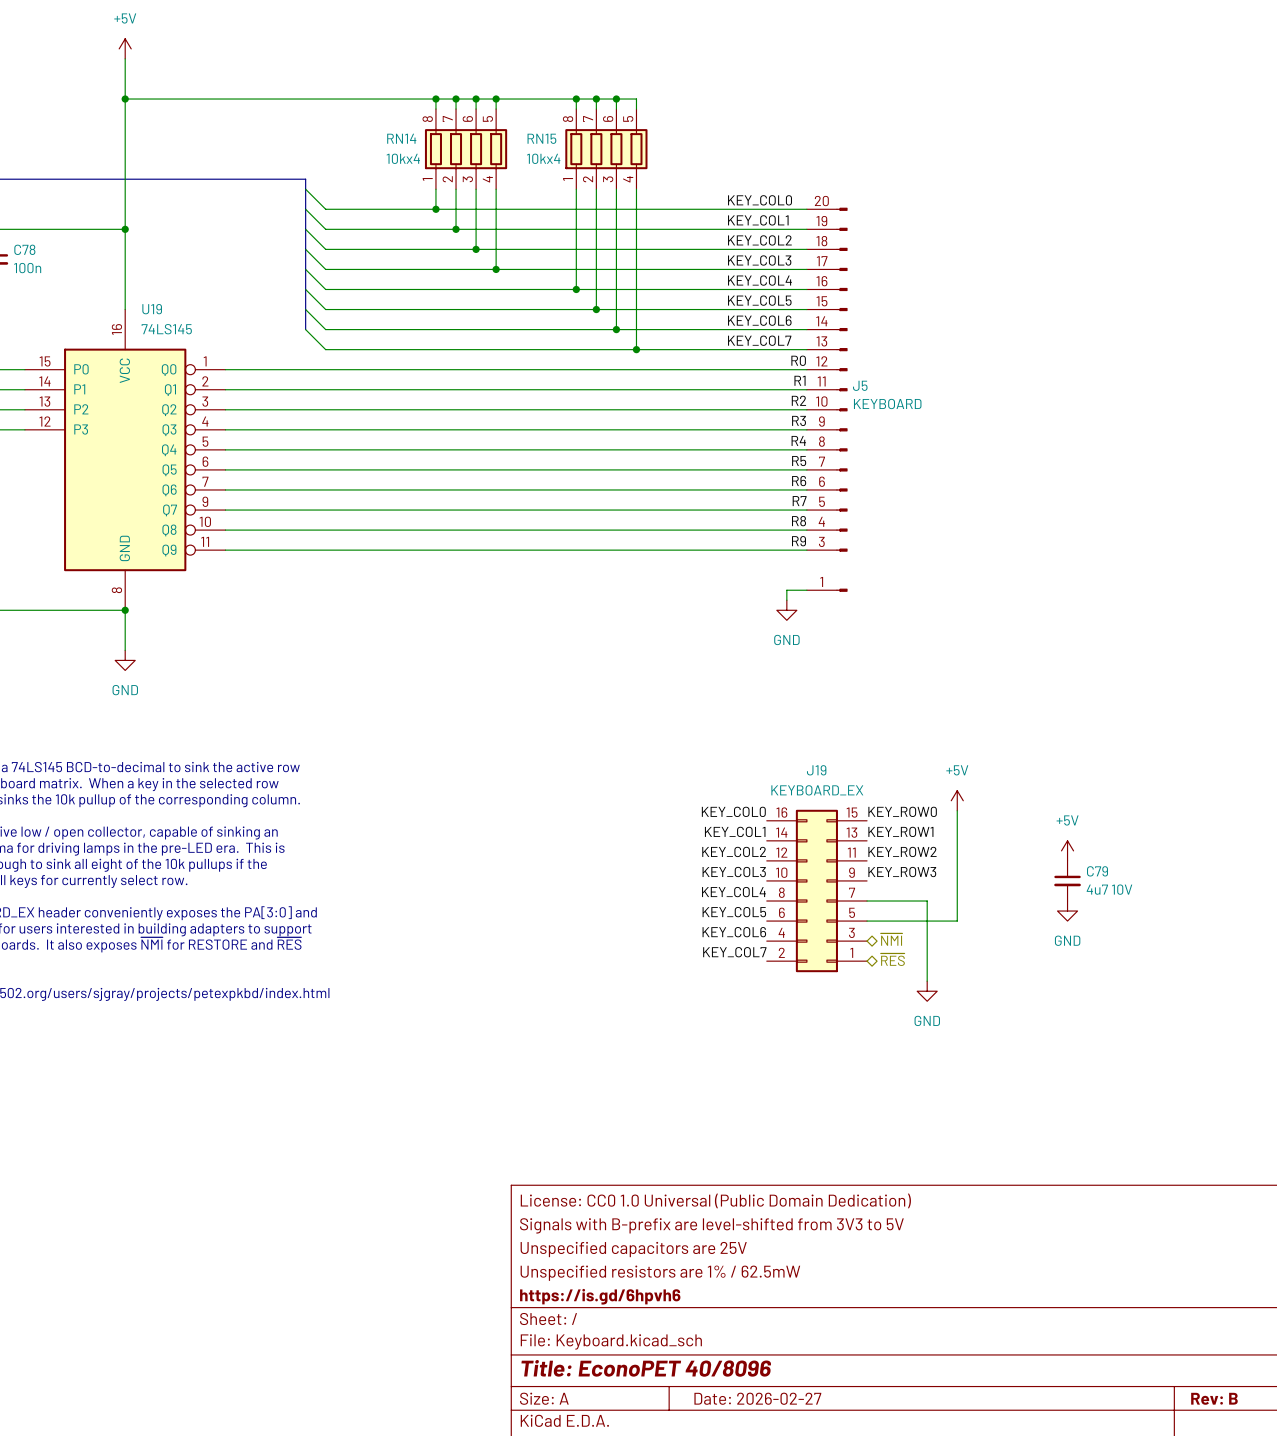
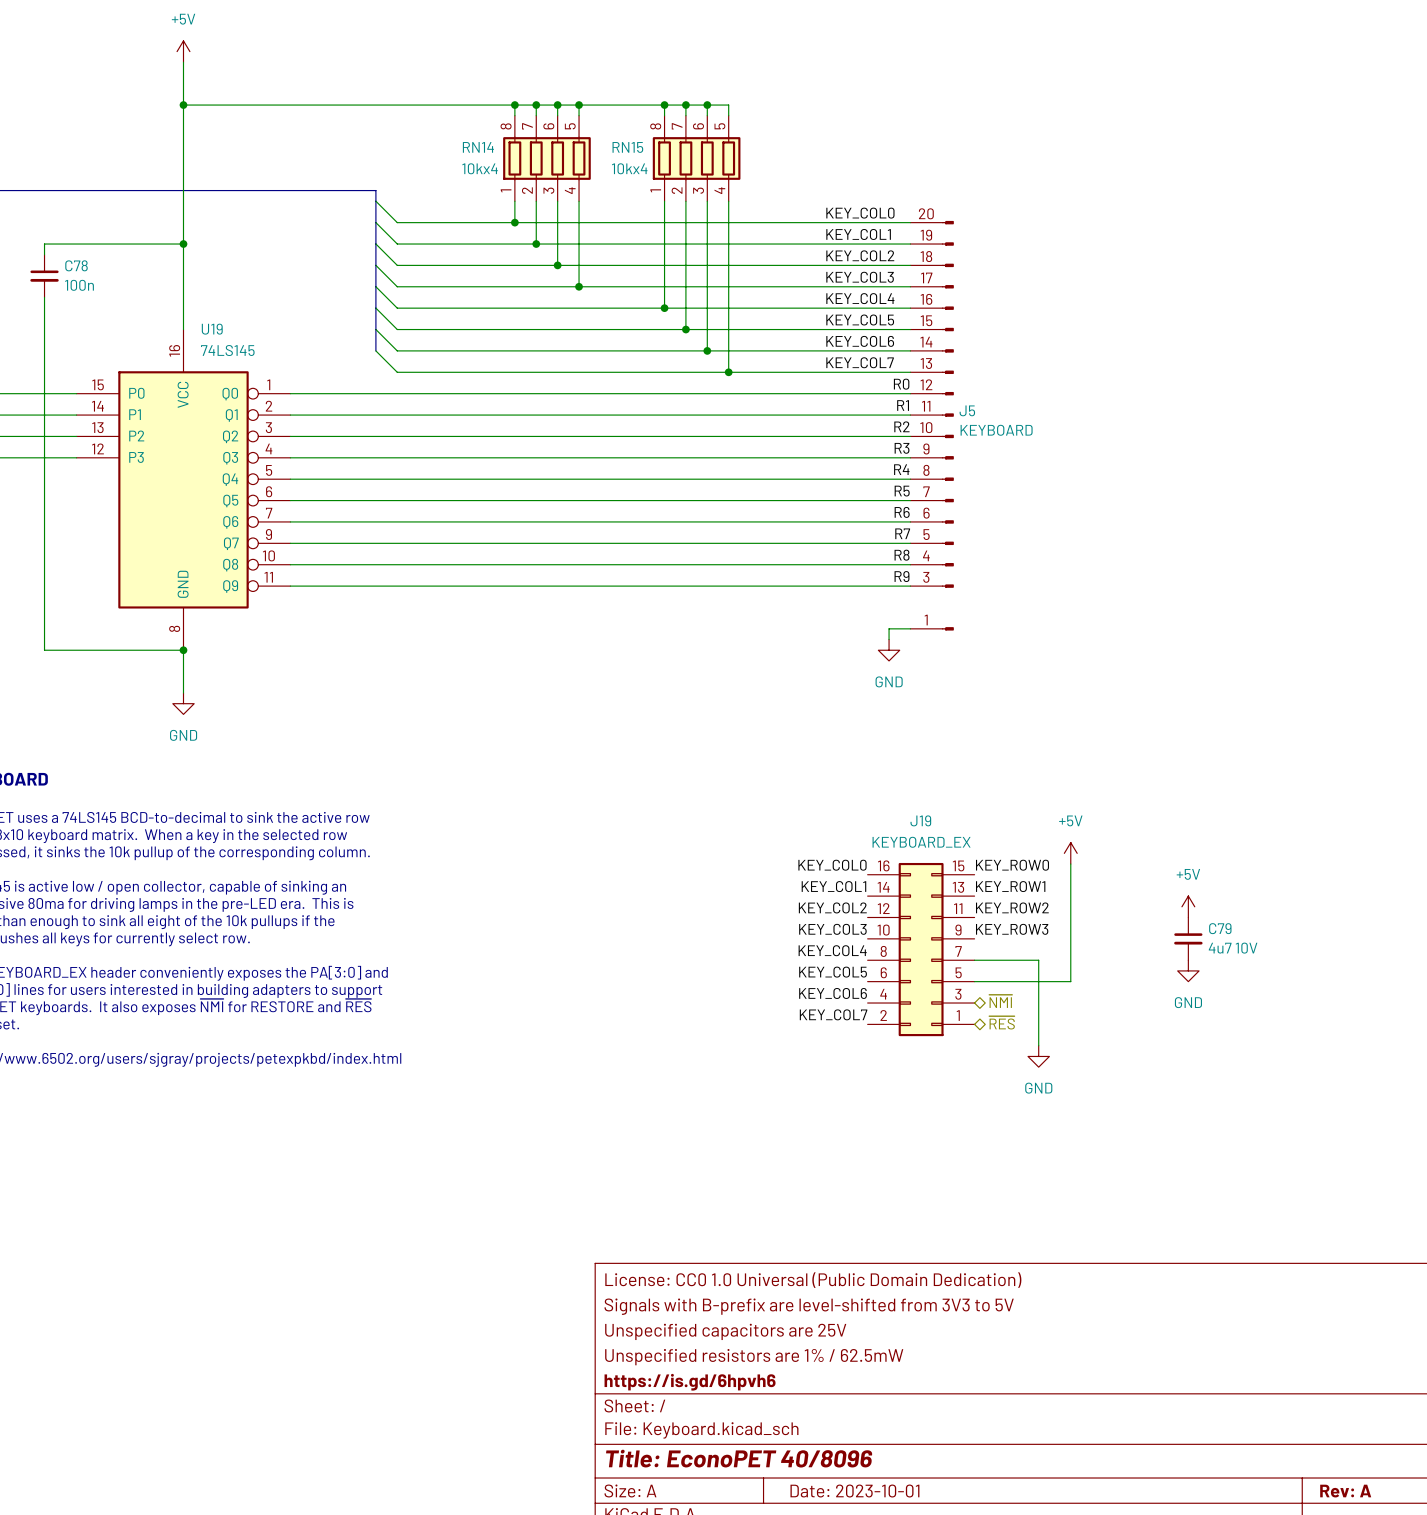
title block: Date: 2026-02-27 (757, 1398) -> Date: 2023-10-01 (854, 1491)
title block: Rev: B (1214, 1398) -> Rev: A (1345, 1491)

